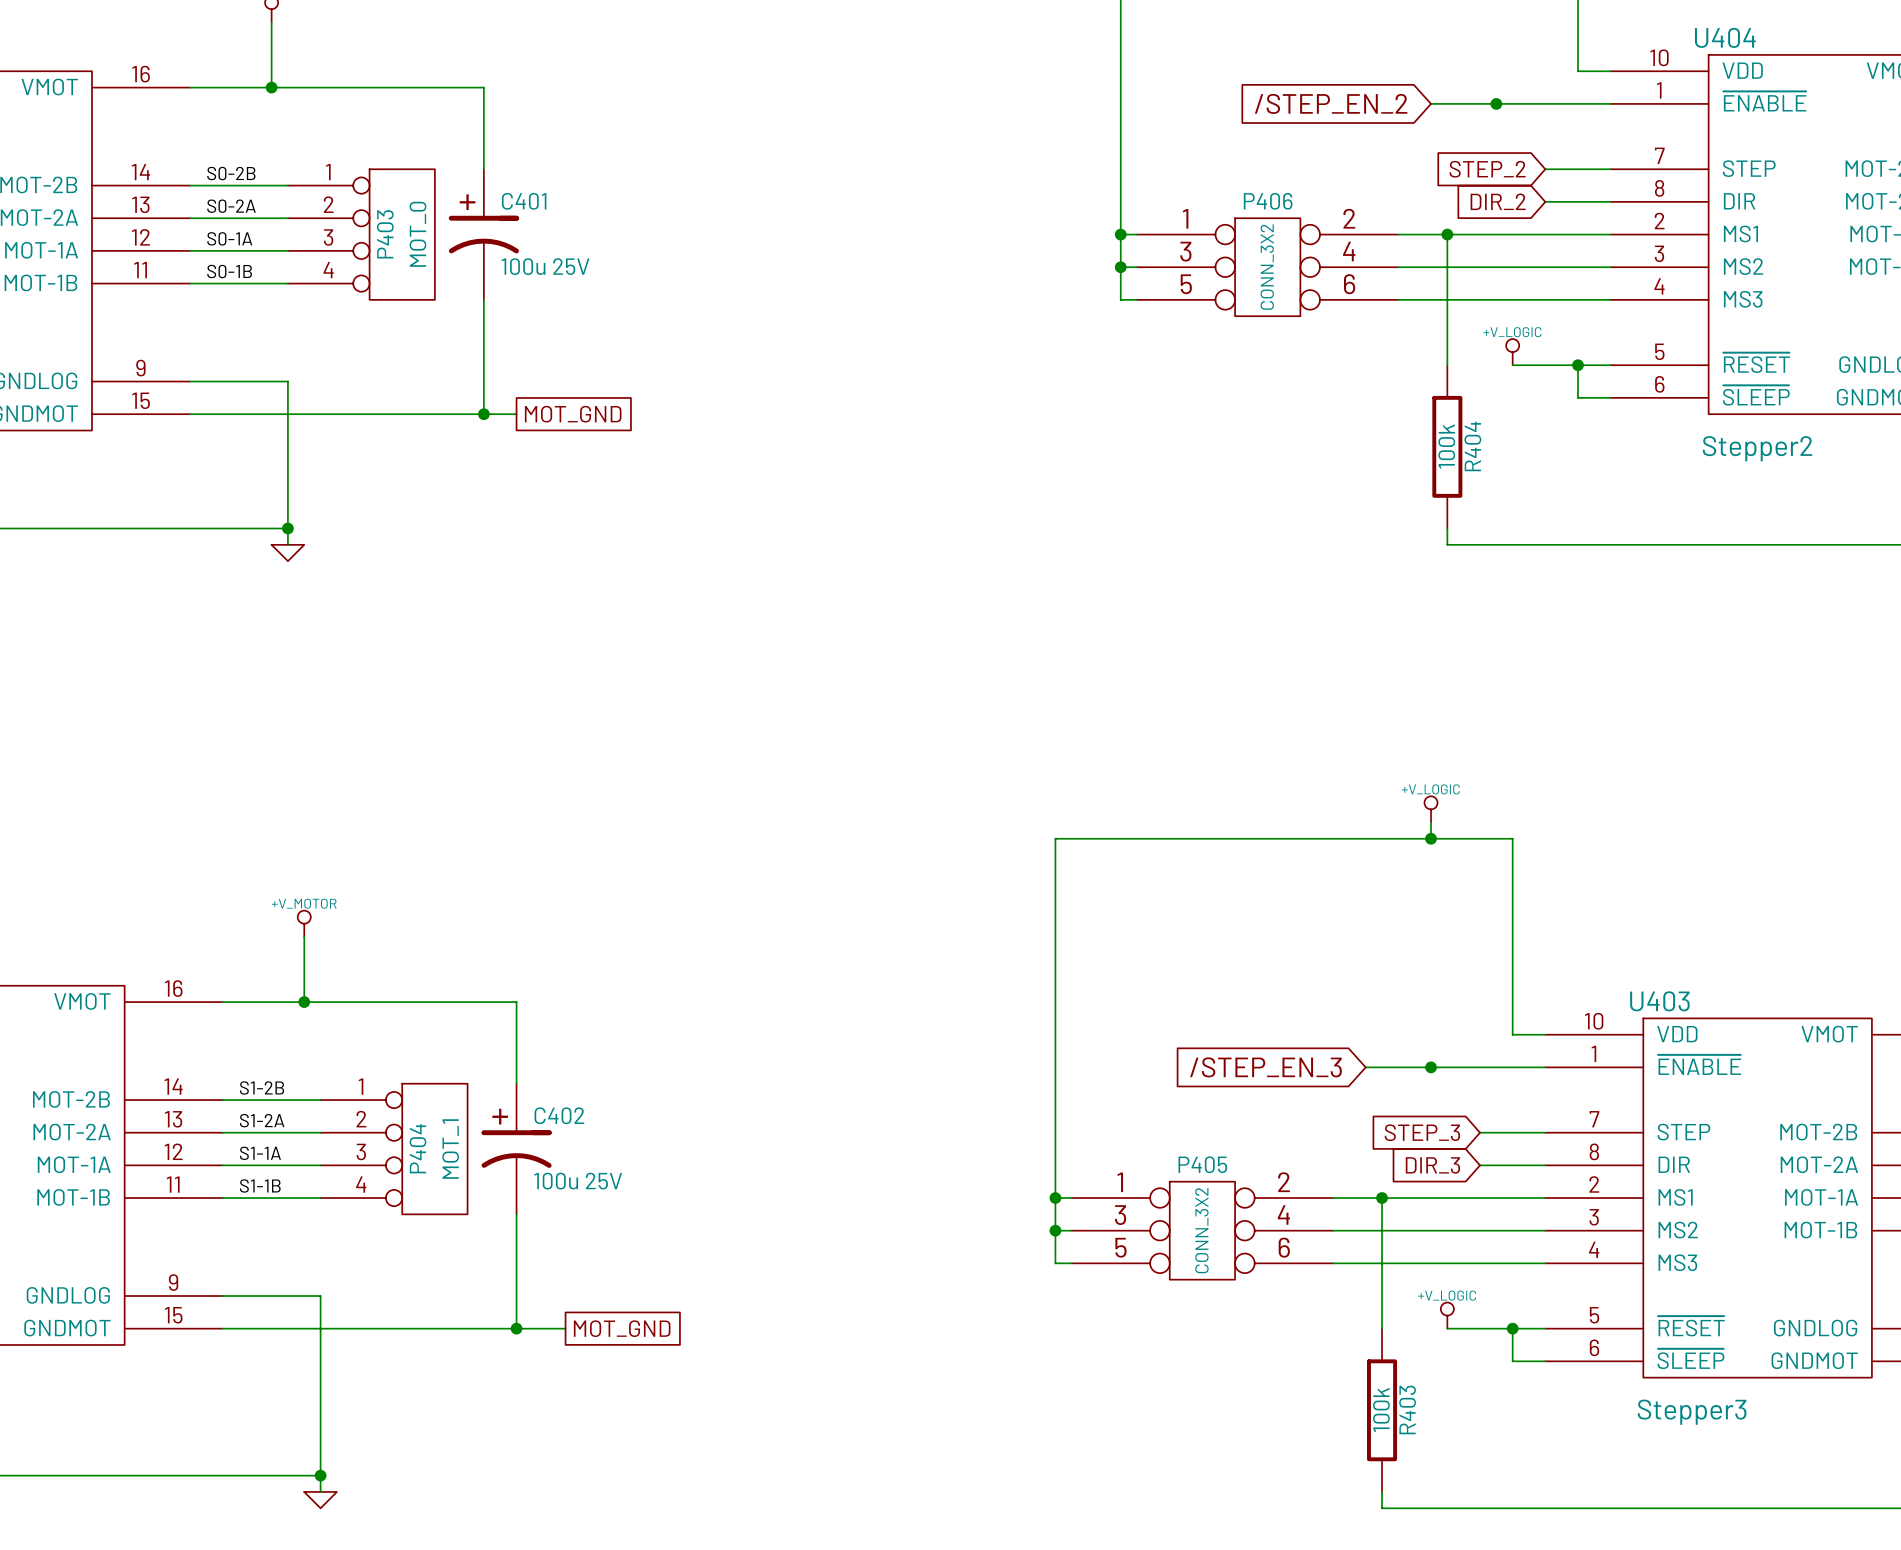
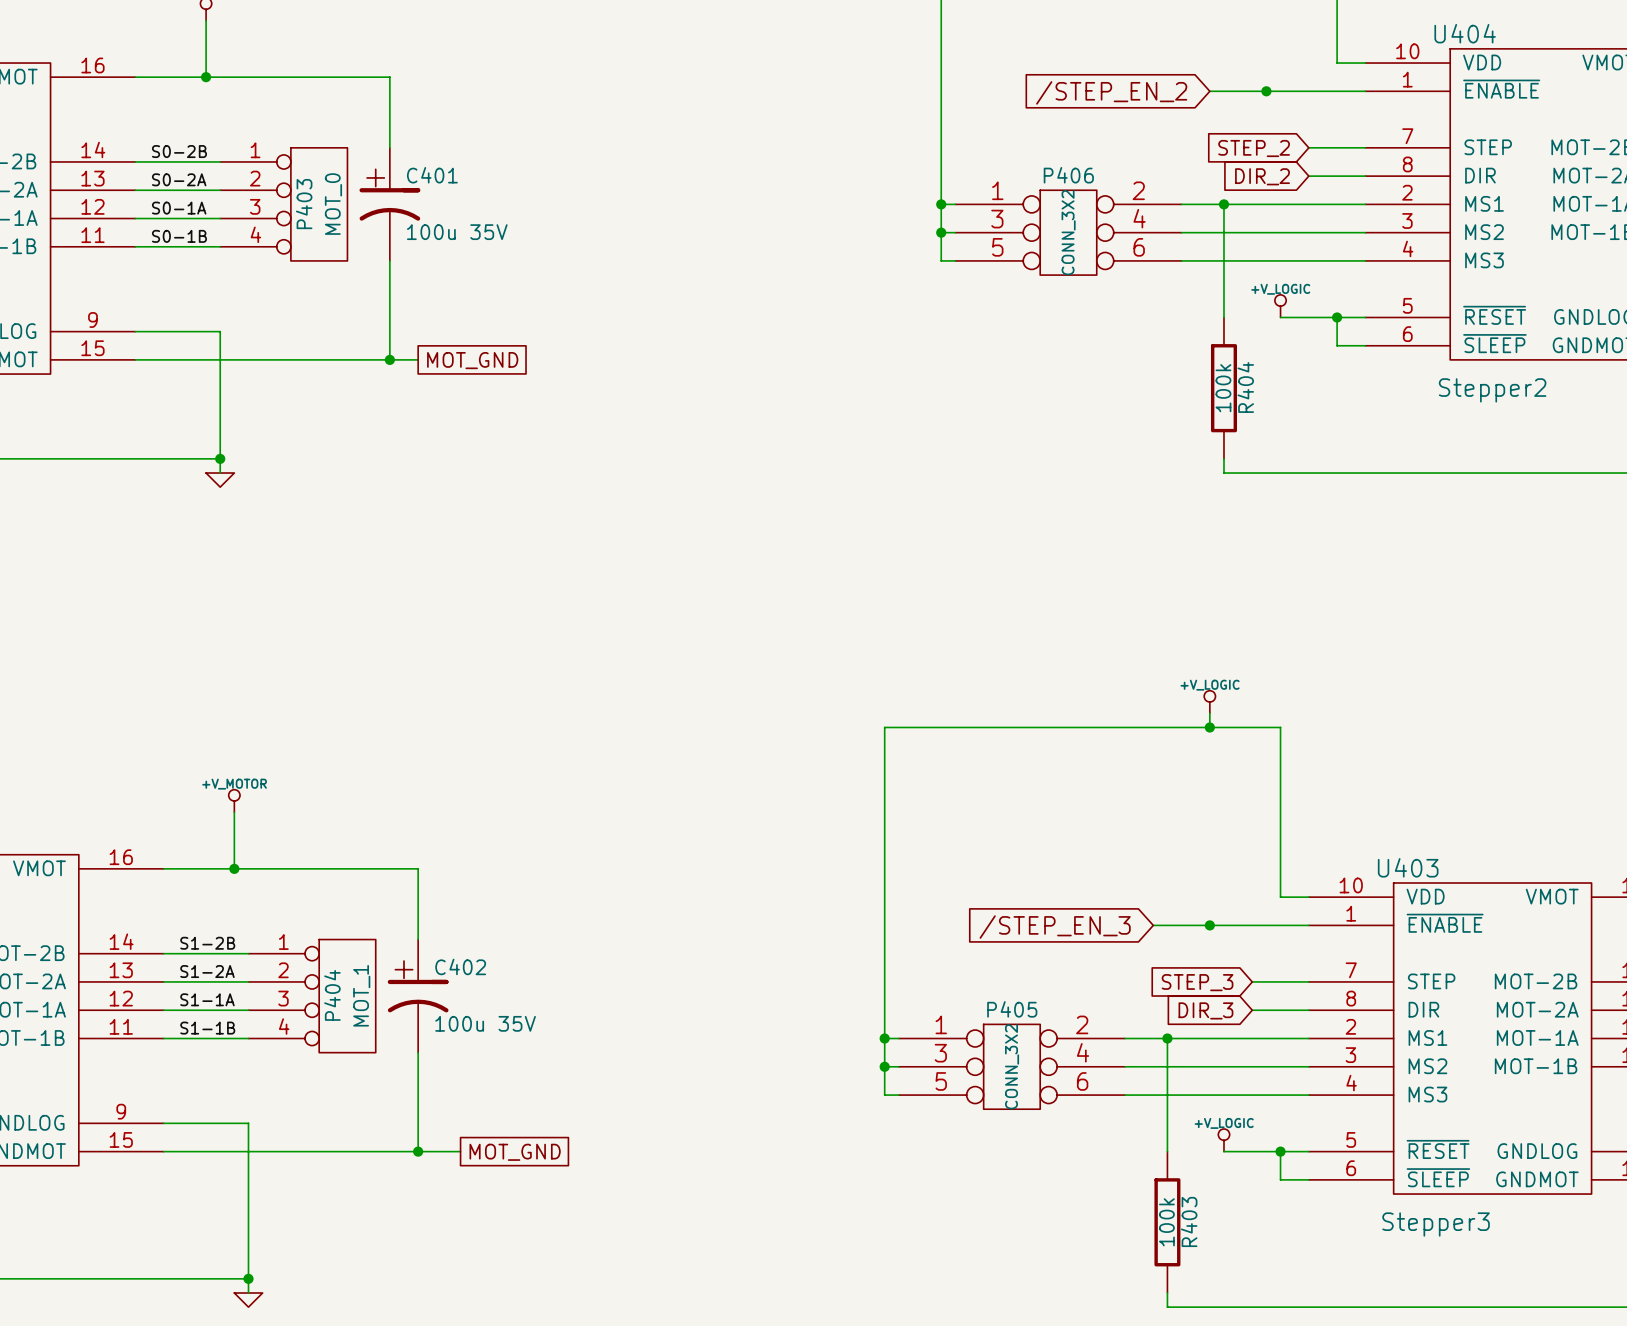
C401 value: 100u 25V (545, 266) -> 100u 35V (457, 232)
C402 value: 100u 25V (578, 1181) -> 100u 35V (485, 1023)

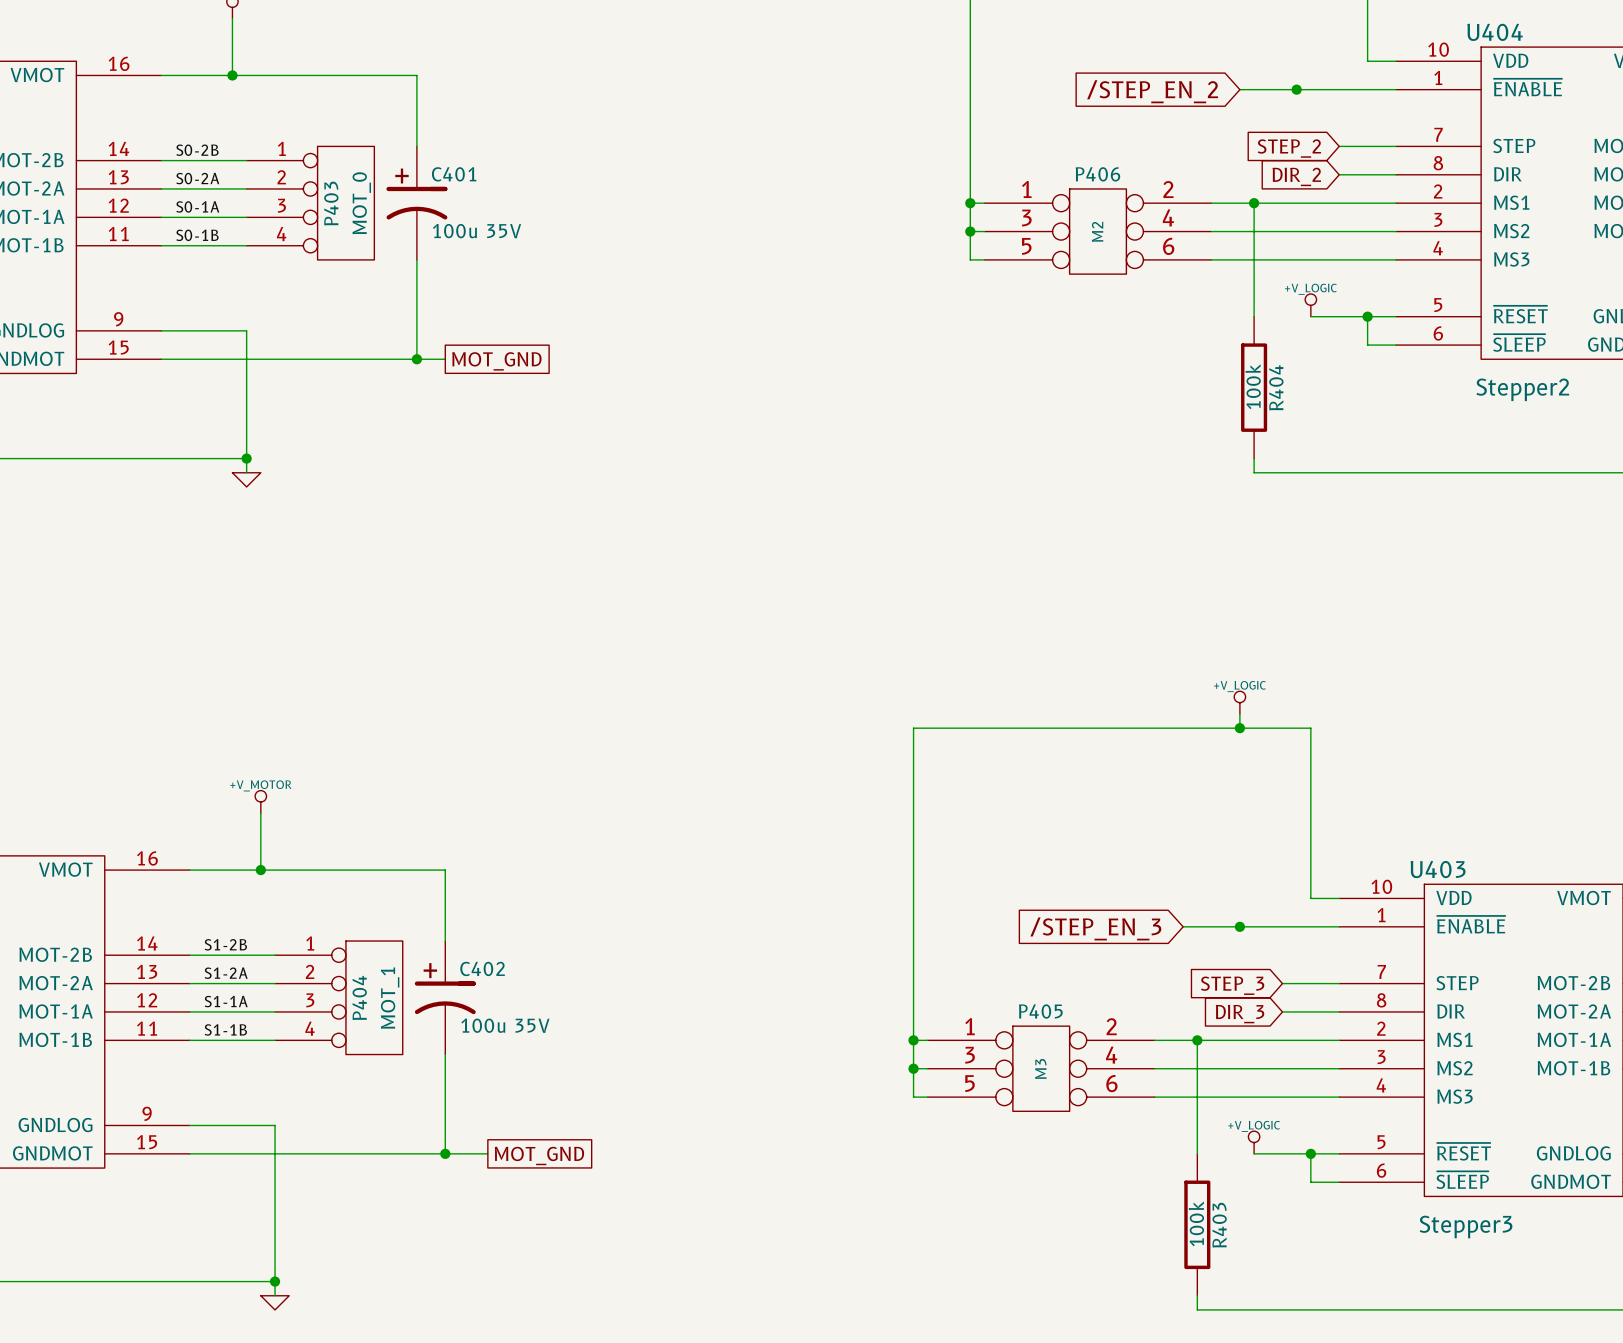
P406 value: CONN_3X2 (1068, 232) -> M2 (1097, 231)
P405 value: CONN_3X2 (1012, 1066) -> M3 (1040, 1068)

